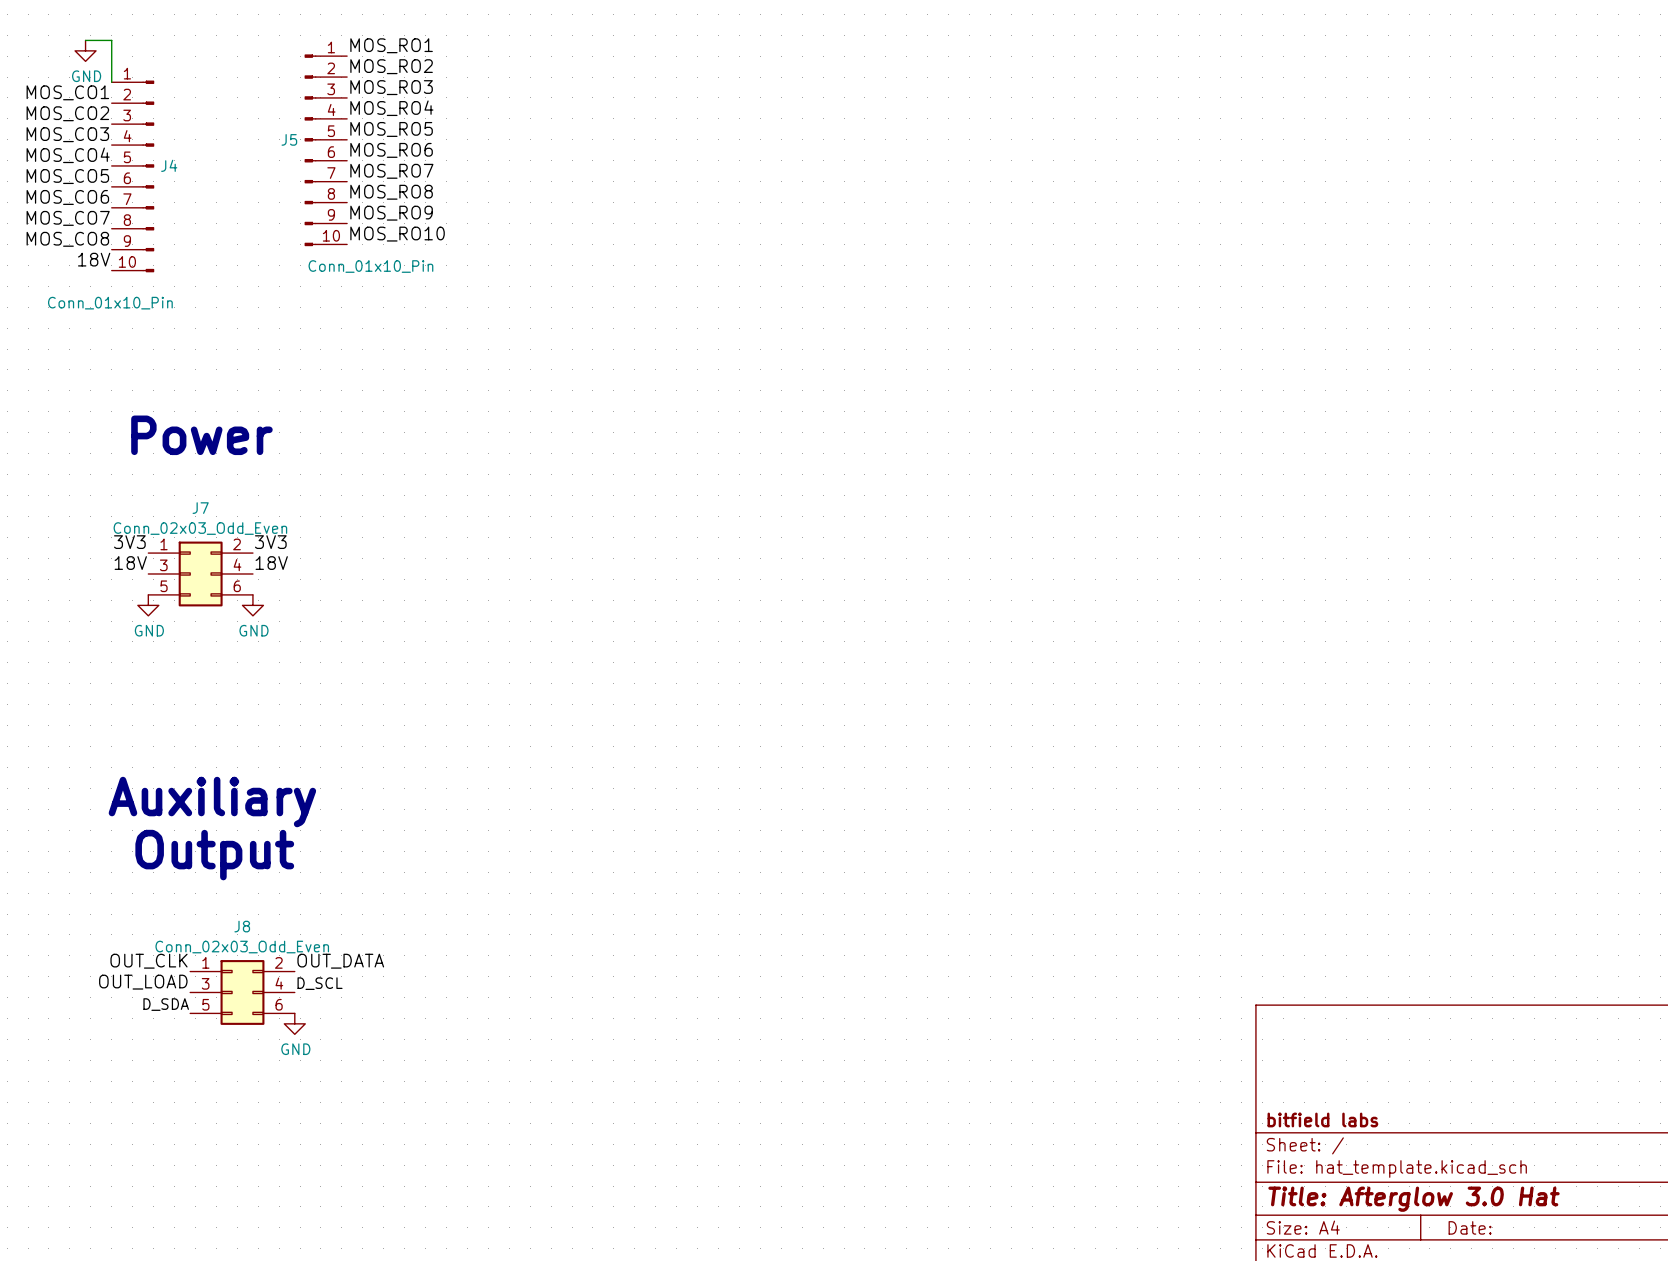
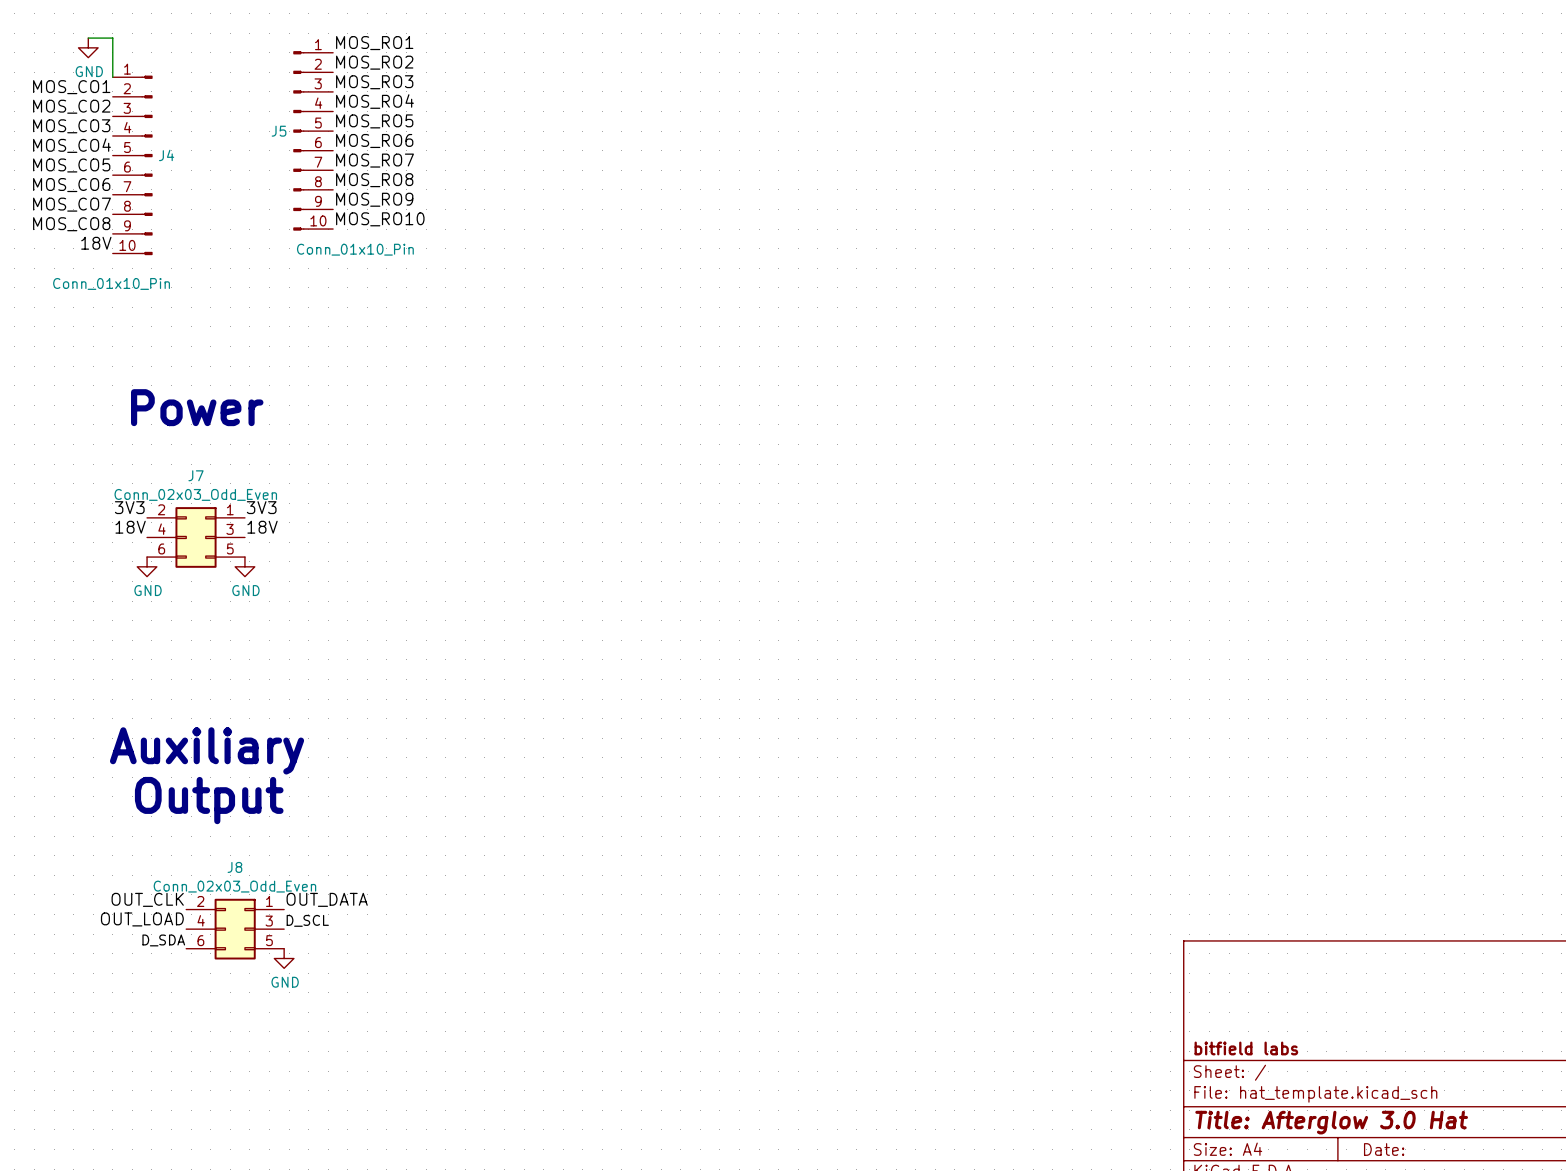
J7 flip: as is (200, 573) -> left-right (196, 537)
J8 flip: as is (242, 992) -> left-right (235, 929)

